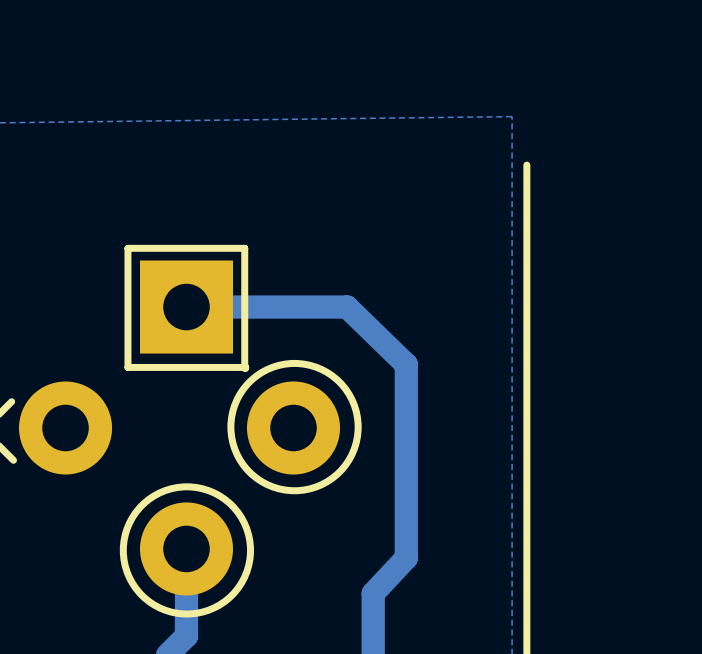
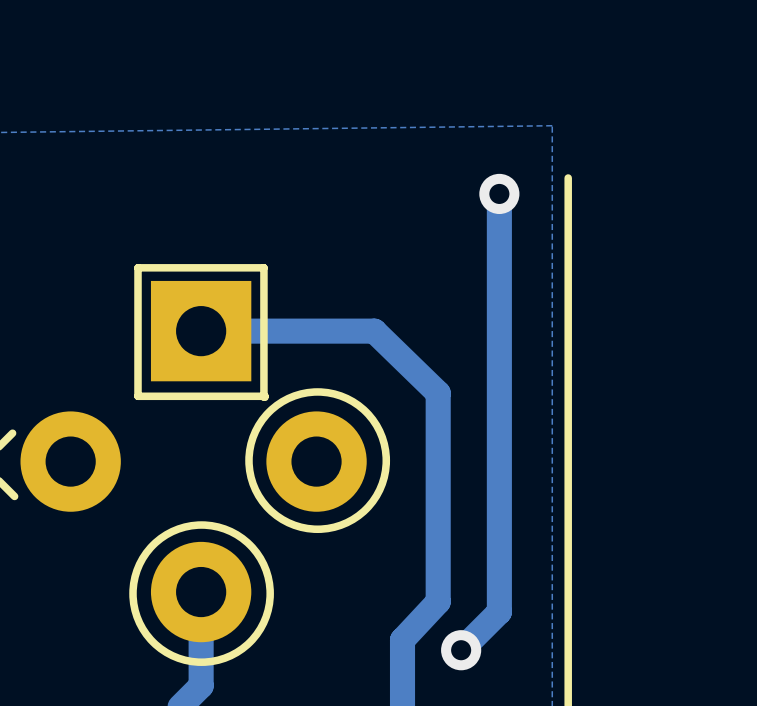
track: none -> (499, 193) (499, 611) (461, 650)
via: none -> (499, 193)
via: none -> (461, 650)

